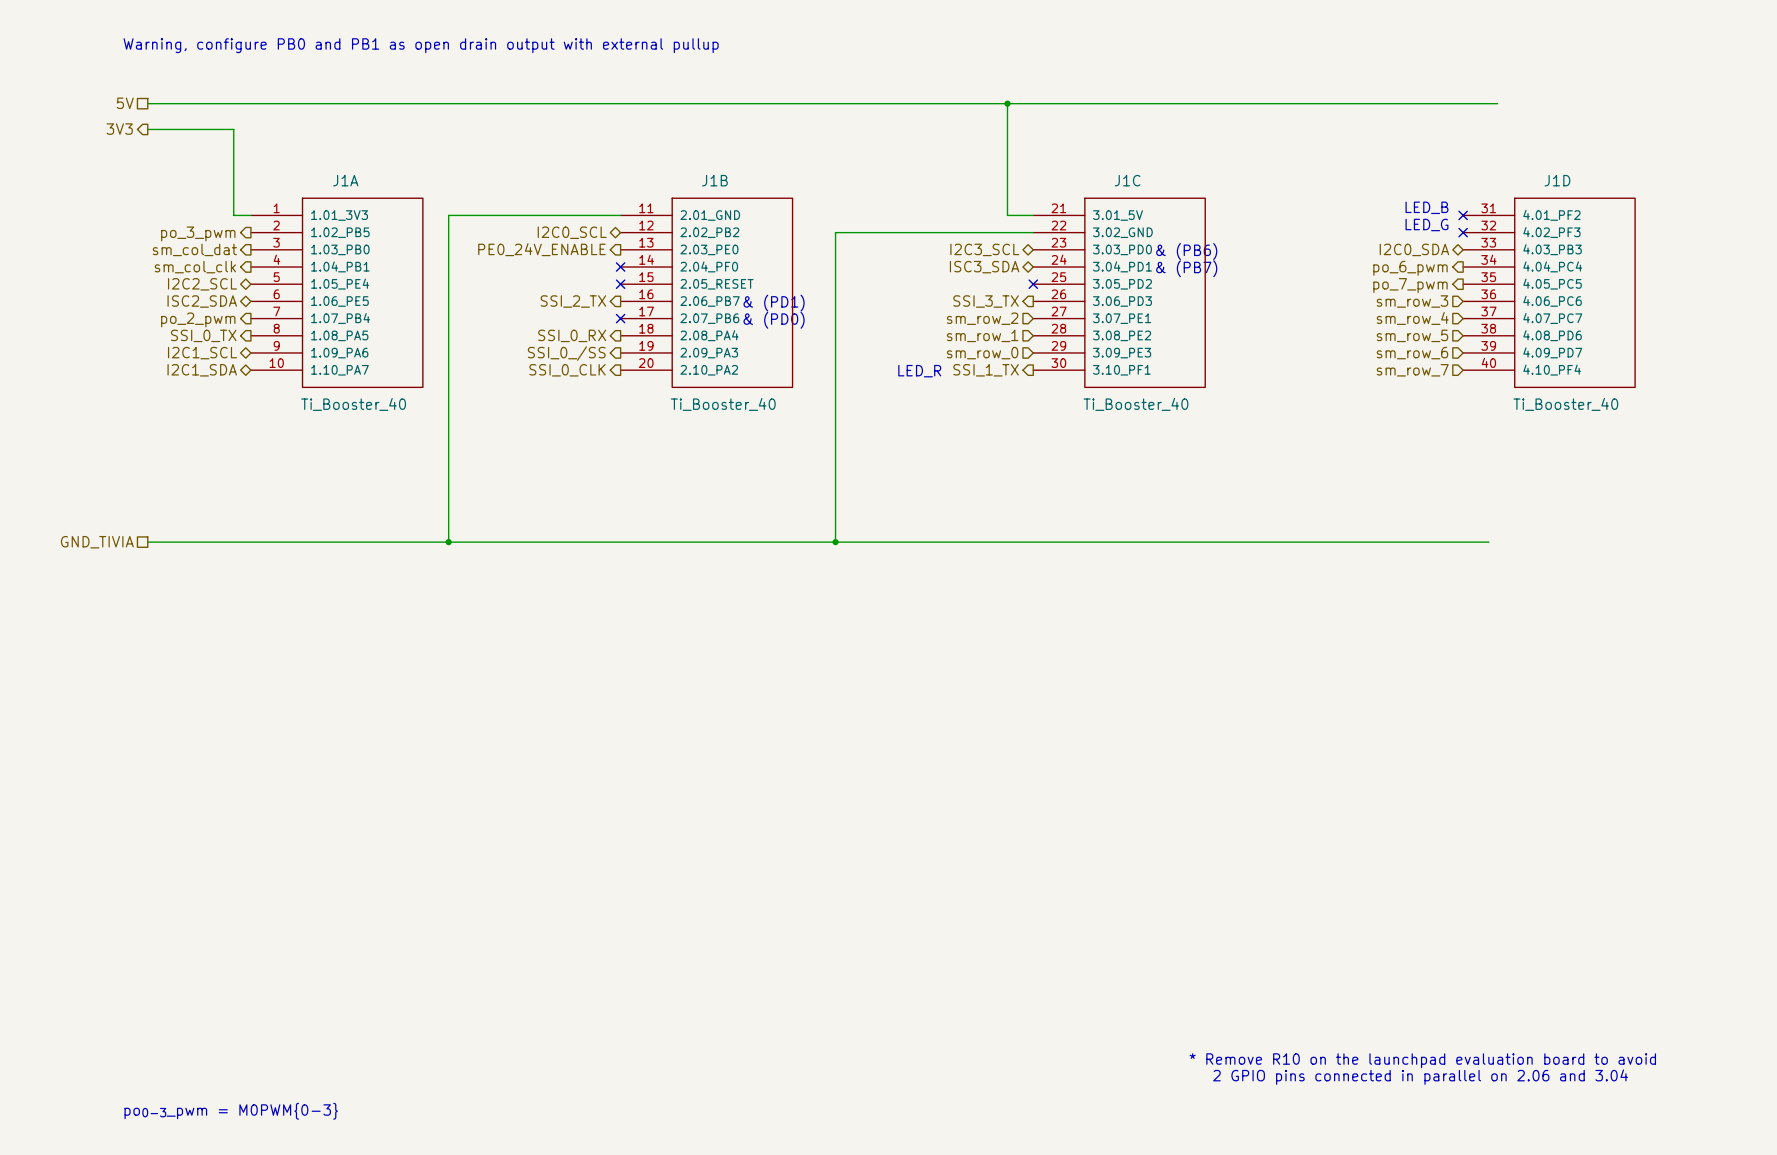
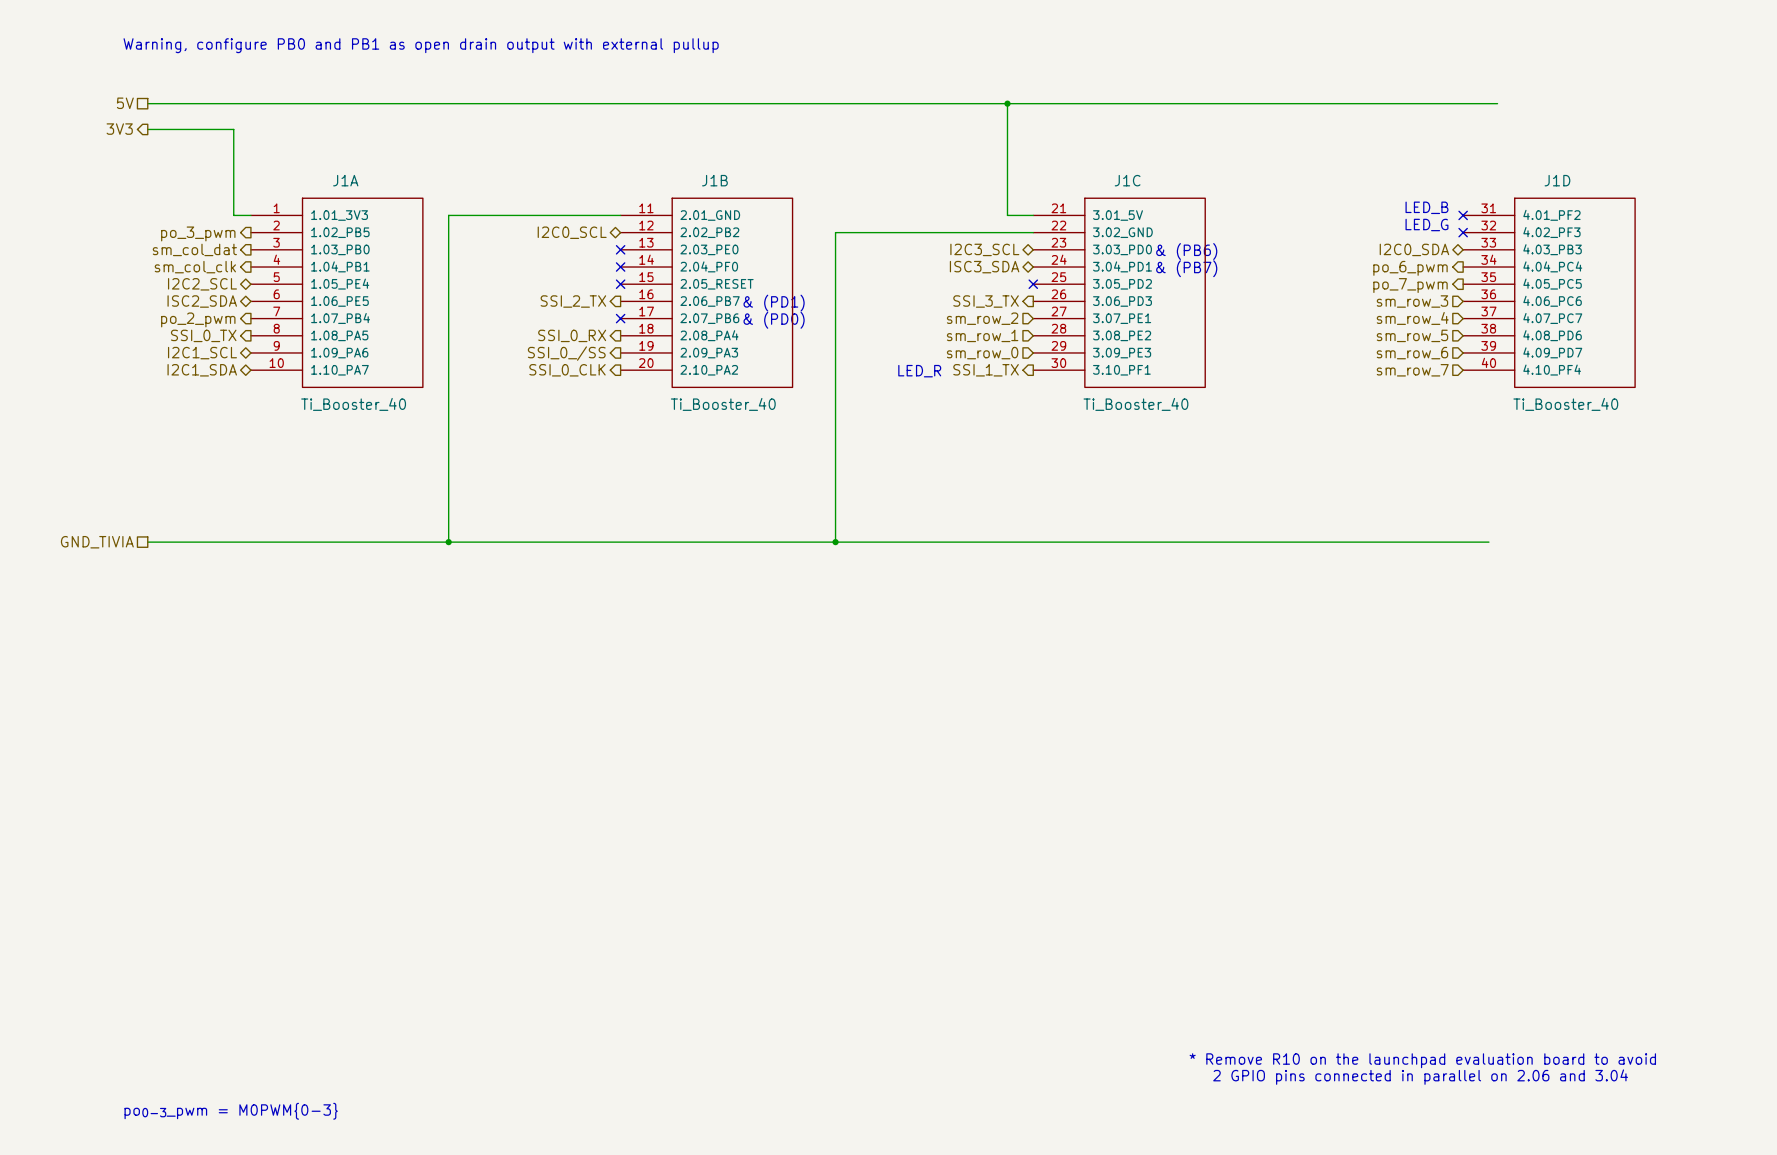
hierarchical label: PE0_24V_ENABLE (541, 249) -> none
no-connect mark: none -> (620, 249)

